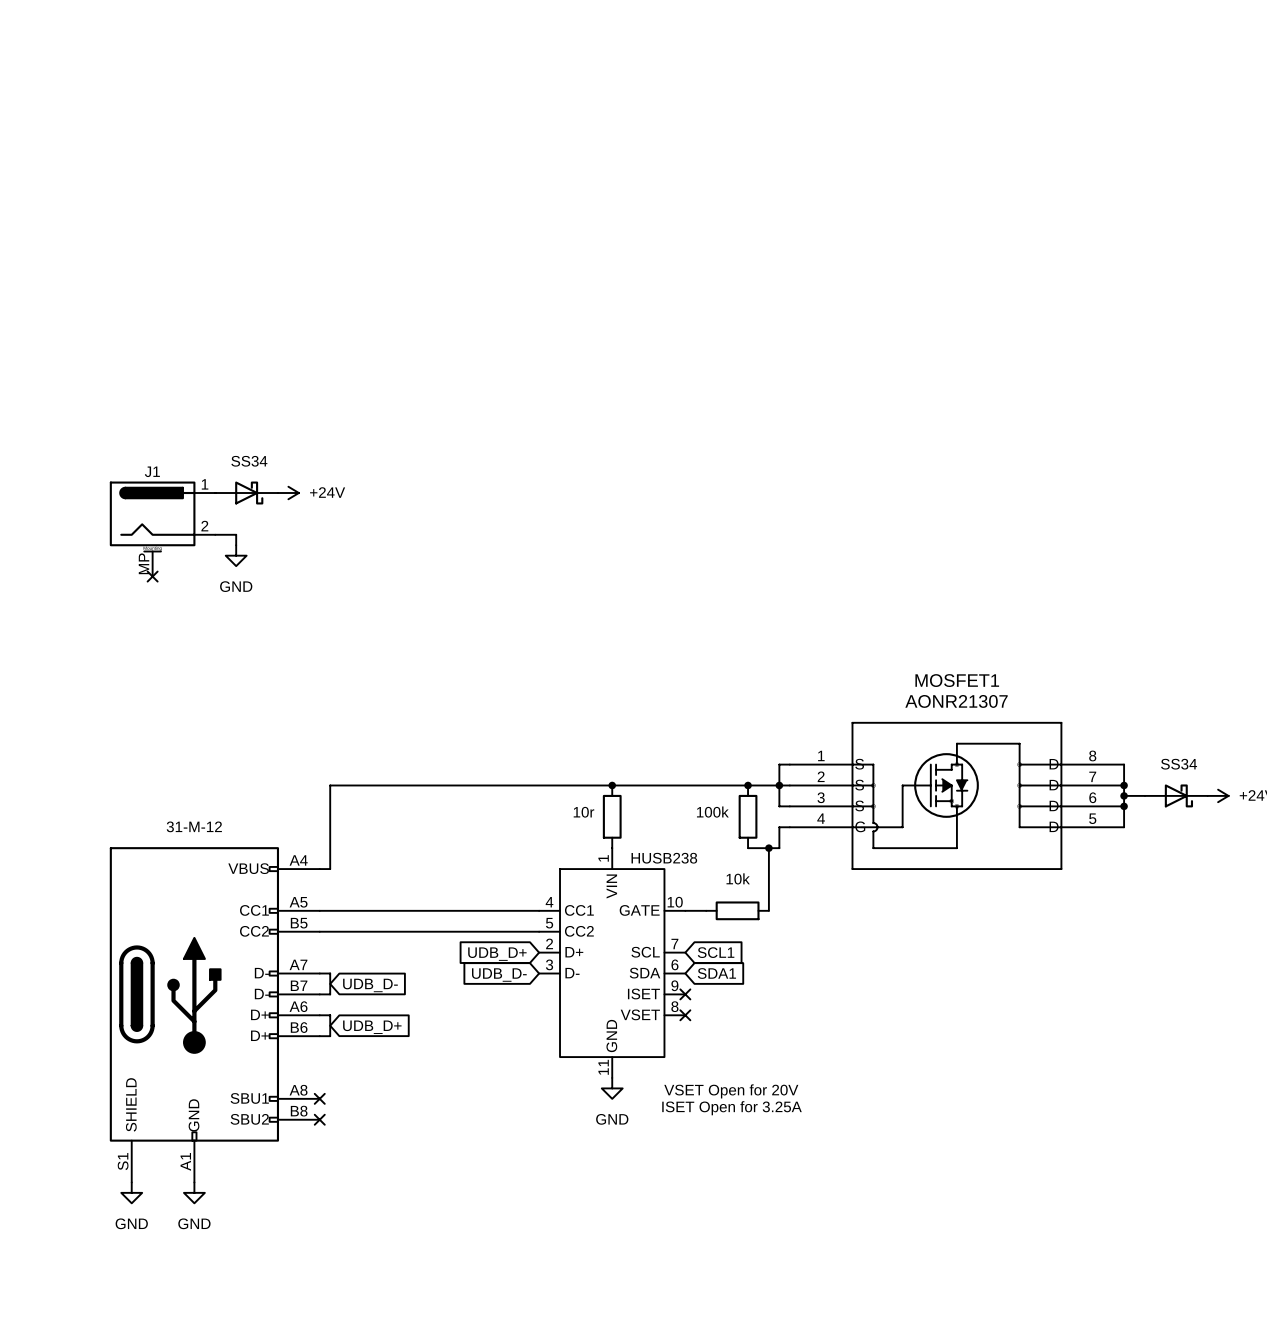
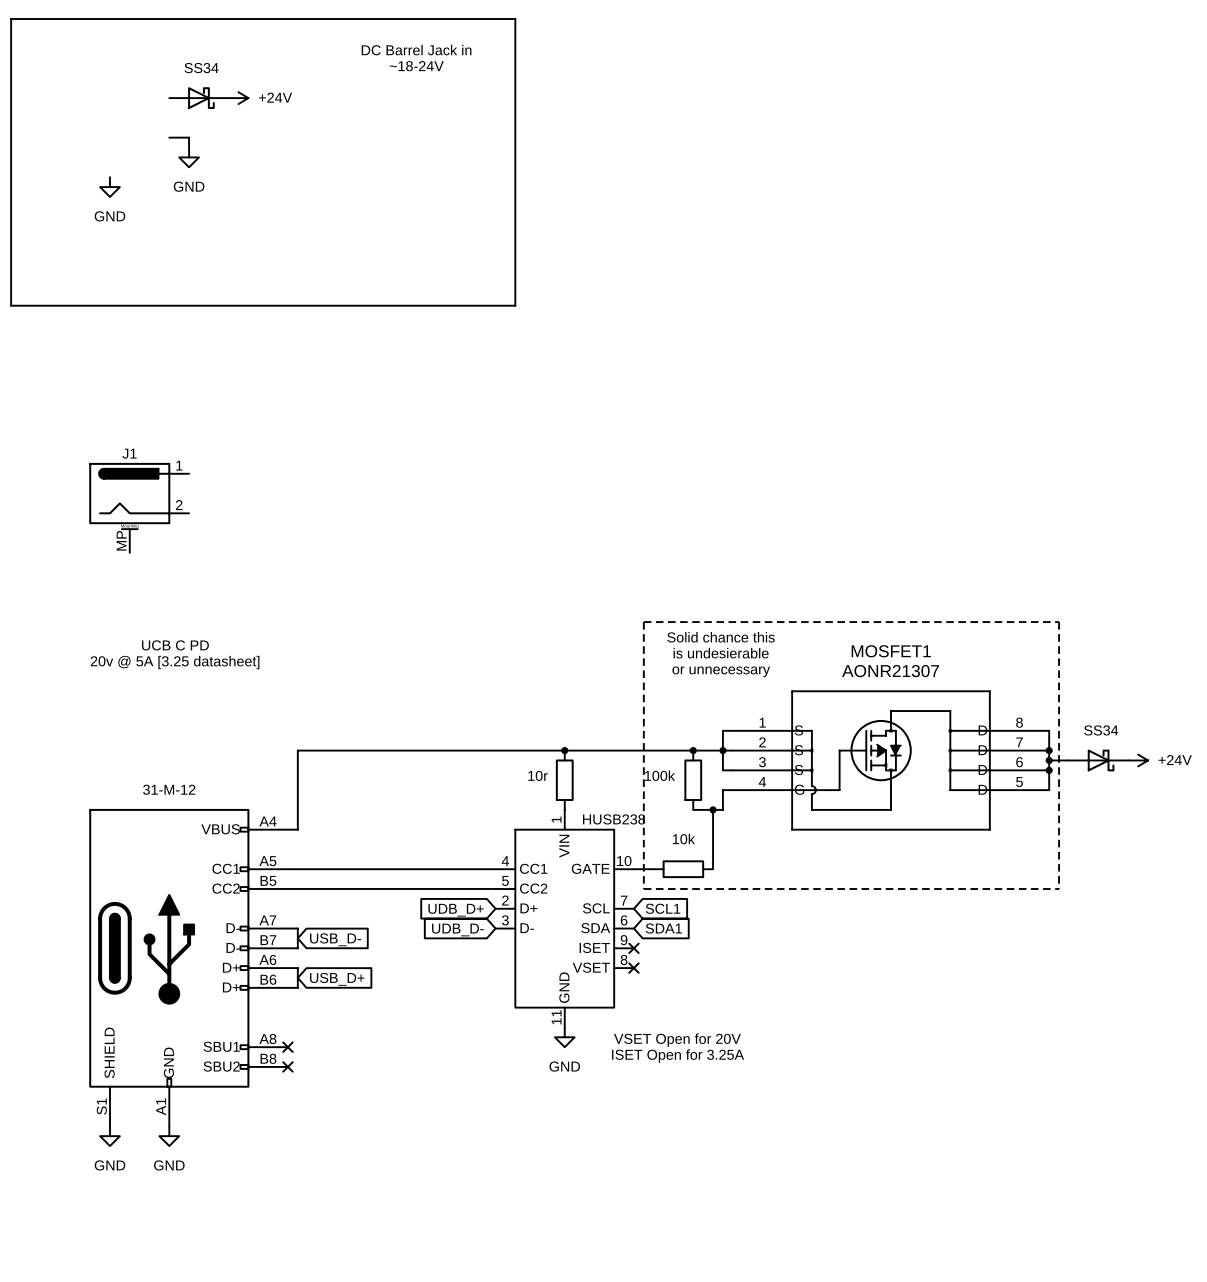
line: none -> (11, 19) (515, 19) (515, 305) (11, 305) (11, 19)
text: none -> DC Barrel Jack in (416, 50)
text: none -> ~18-24V (416, 66)
part: none -> SS34 (198, 98)
power symbol: none -> +24V (238, 98)
wire: none -> (169, 137) (189, 137) (189, 147)
power symbol: none -> GND (189, 157)
power symbol: none -> GND (109, 187)
part: SS34 (246, 493) -> none
power symbol: +24V (288, 493) -> none
wire: (215, 534) (236, 534) (236, 545) -> none
power symbol: GND (236, 555) -> none
no-connect mark: (152, 576) -> none
line: none -> (643, 622) (1059, 622) (1059, 888) (643, 888) (643, 622)
text: none -> Solid chance this (721, 637)
text: none -> UCB C PD (175, 645)
text: none -> is undesierable (721, 653)
text: none -> 20v @ 5A [3.25 datasheet] (175, 662)
text: none -> or unnecessary (721, 671)
global label: UDB_D- (370, 985) -> USB_D- (335, 939)
global label: UDB_D+ (372, 1027) -> USB_D+ (337, 979)

